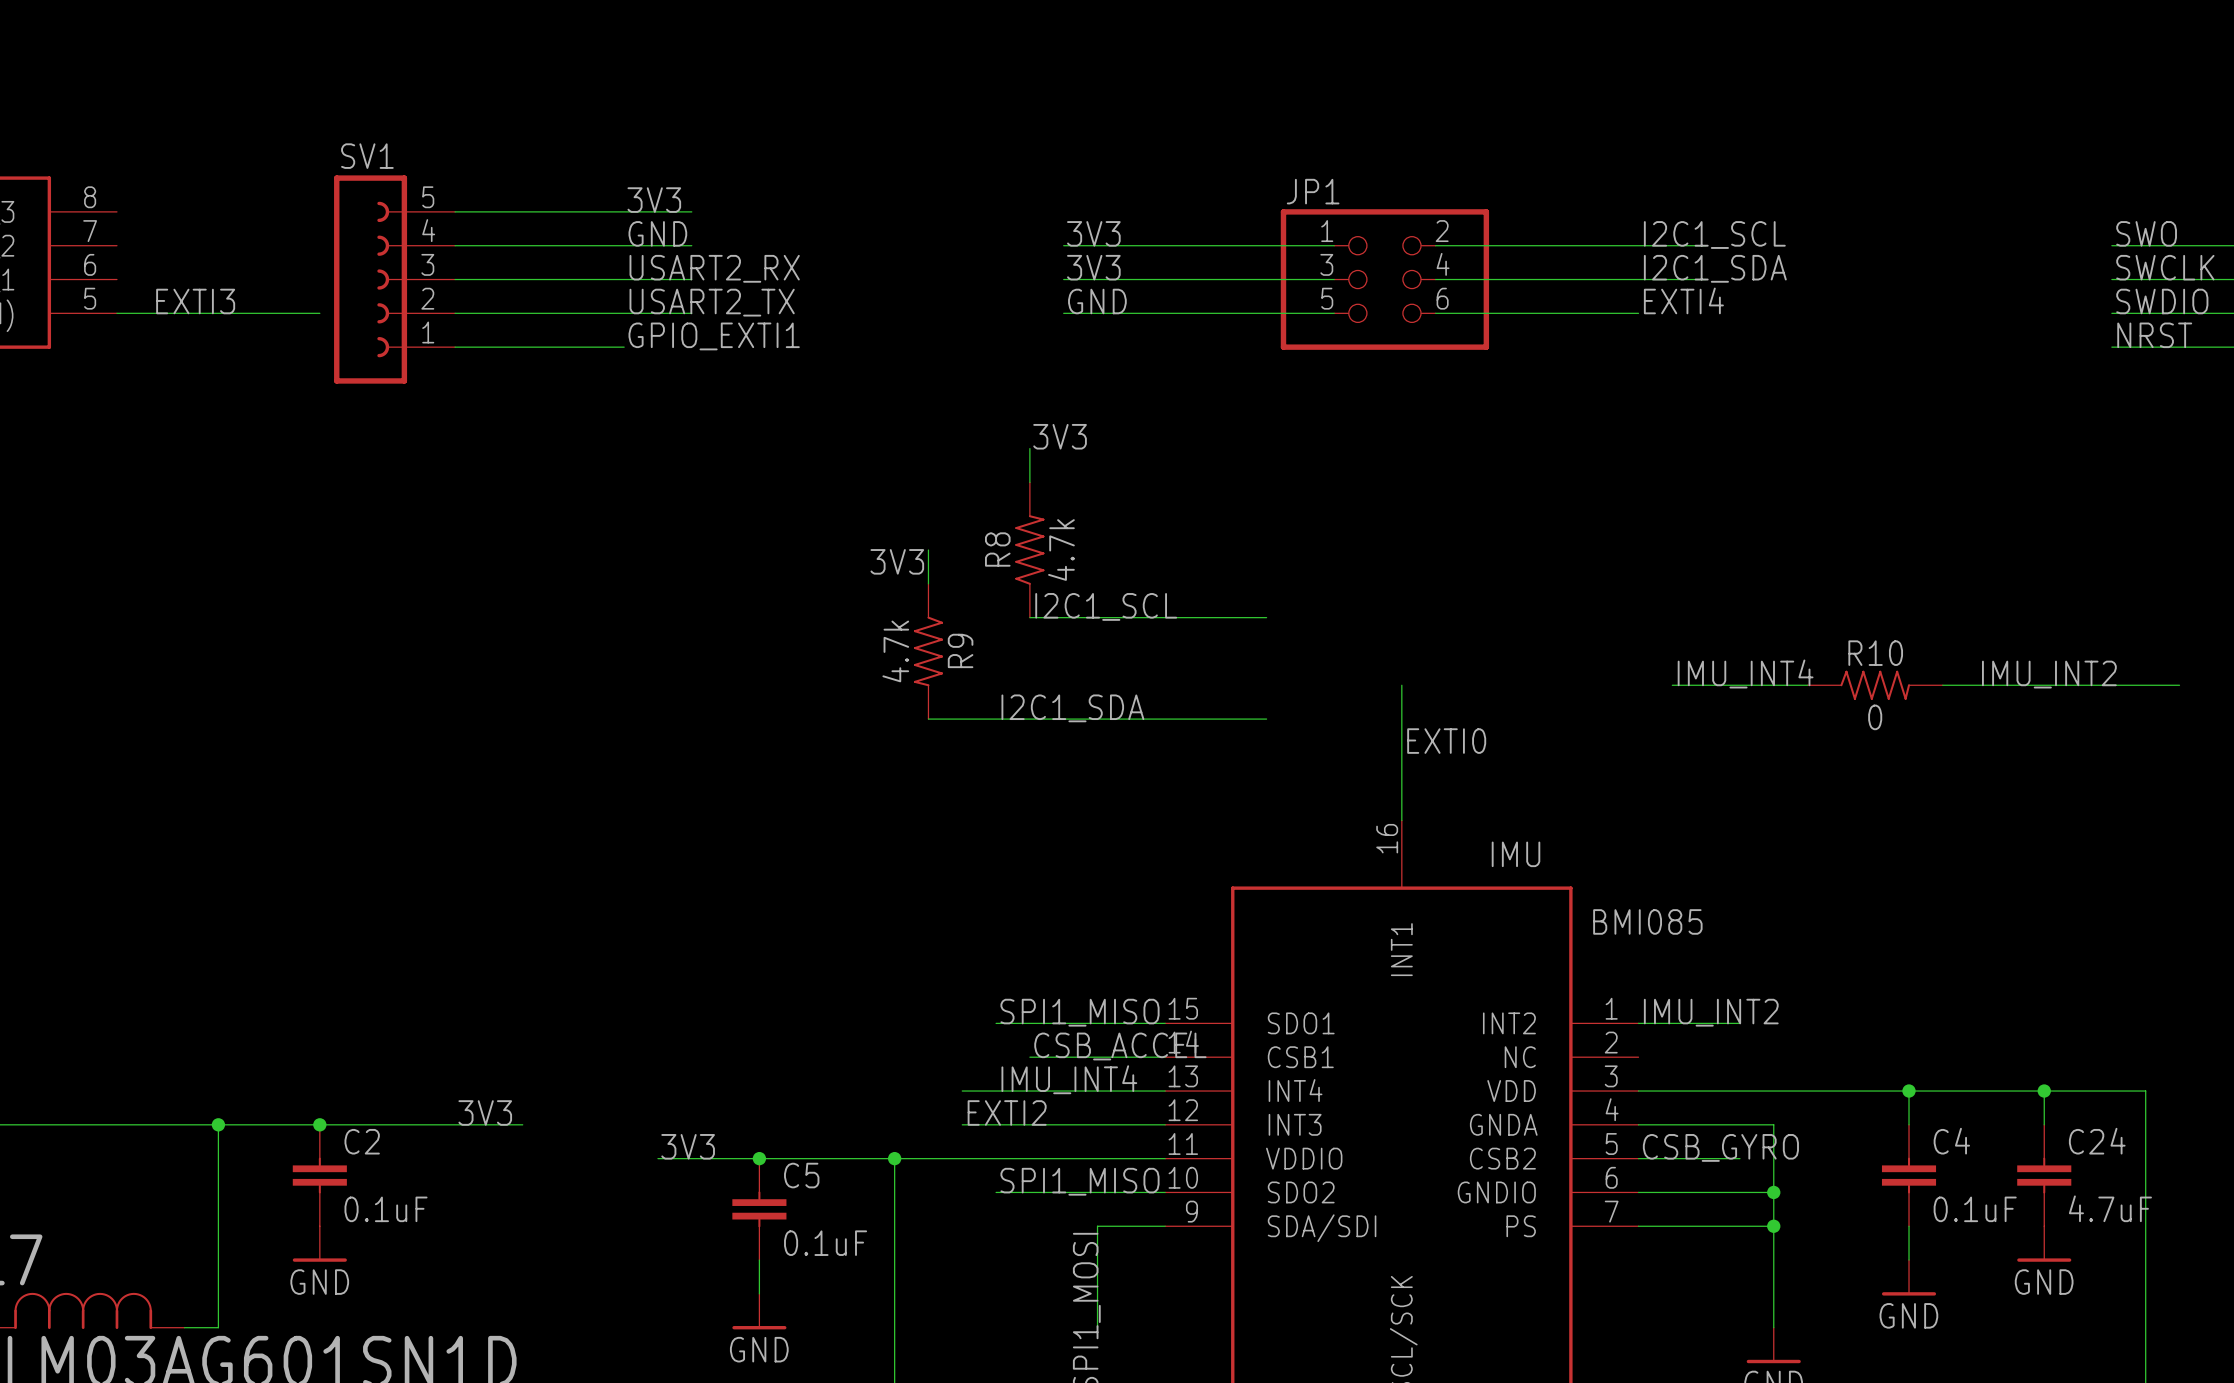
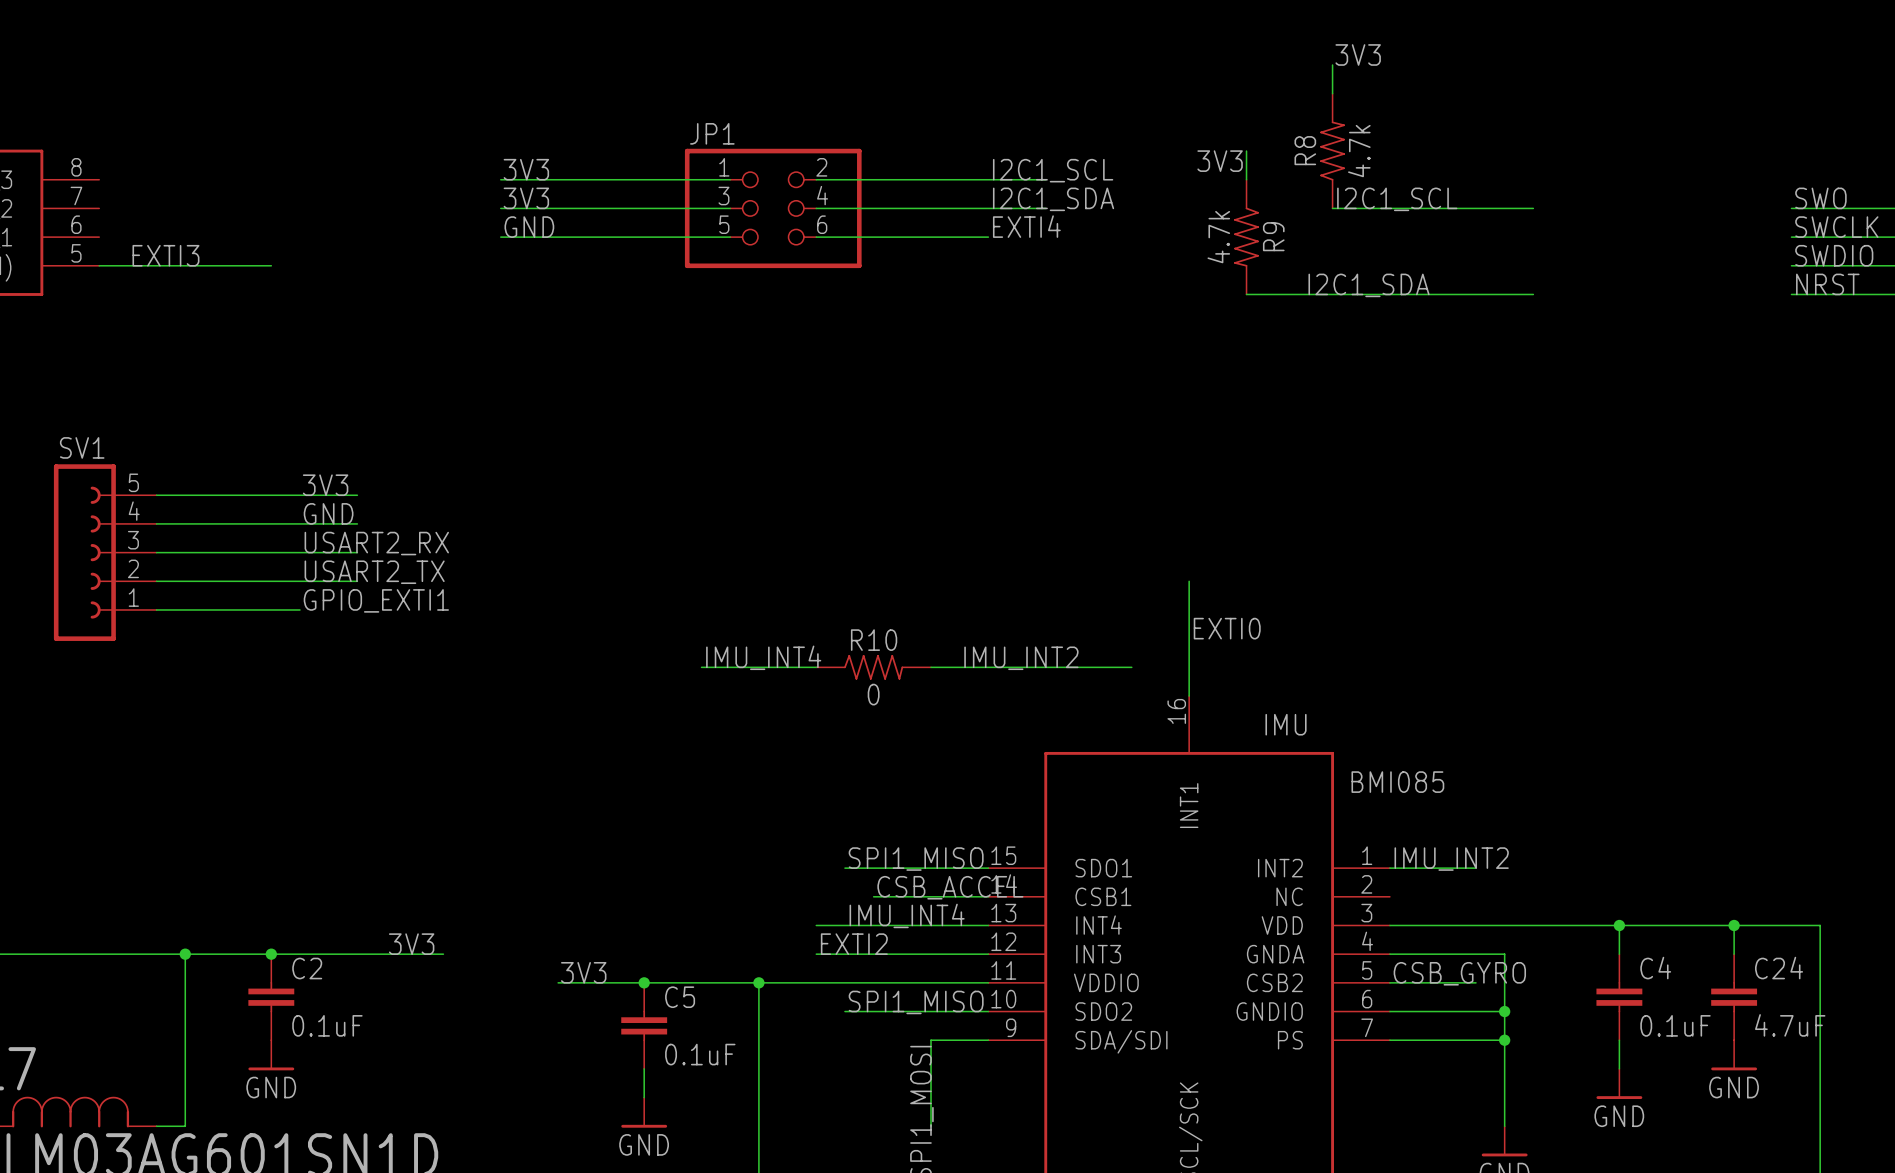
label: none -> 3V3 (1358, 54)
wire: none -> (1332, 65) (1332, 93)
wire: none -> (1246, 151) (1246, 179)
label: none -> 3V3 (1220, 161)
label: none -> 3V3 (526, 169)
label: 3V3 (654, 200) -> none
label: none -> I2C1_SCL (1053, 170)
wire: (455, 211) (590, 211) -> none
wire: none -> (586, 179) (730, 179)
label: none -> 3V3 (526, 198)
label position: GND (657, 233) -> GND (529, 227)
label: 3V3 (1093, 233) -> none
label: none -> I2C1_SDA (1053, 199)
label position: I2C1_SCL (1714, 235) -> I2C1_SCL (1397, 199)
wire: (455, 245) (590, 245) -> none
wire: none -> (586, 208) (730, 208)
wire: (1232, 245) (1334, 245) -> (816, 208) (902, 208)
wire: (1435, 245) (1570, 245) -> none
wire: none -> (1447, 208) (1533, 208)
label: 3V3 (1093, 267) -> none
label: none -> EXTI4 (1026, 226)
label: USART2_RX (714, 268) -> none
label position: I2C1_SDA (1715, 268) -> I2C1_SDA (1369, 285)
SV1 position: (394, 279) -> (105, 552)
wire: (455, 279) (590, 279) -> none
wire: none -> (816, 237) (902, 237)
wire: (1165, 279) (1334, 279) -> none
JP1 position: (1384, 279) -> (773, 208)
wire: (1435, 279) (1706, 279) -> none
label: EXTI4 (1683, 300) -> none
label: GND (1097, 301) -> none
label: USART2_TX (712, 302) -> none
wire: (455, 313) (691, 313) -> none
wire: (1063, 313) (1334, 313) -> (816, 179) (1045, 179)
wire: (1435, 313) (1638, 313) -> none
label: GPIO_EXTI1 (714, 336) -> none
wire: (455, 347) (624, 347) -> (586, 237) (730, 237)
wire: none -> (1246, 294) (1533, 294)
label: 3V3 (1060, 436) -> none
wire: (1029, 448) (1029, 482) -> none
wire: (928, 550) (928, 583) -> none
R8 position: (1029, 550) -> (1332, 151)
label: 3V3 (897, 561) -> none
label: none -> 3V3 (325, 485)
wire: none -> (156, 495) (357, 495)
label: none -> GND (328, 513)
label: I2C1_SCL (1106, 606) -> none
wire: none -> (156, 523) (357, 523)
wire: (1029, 617) (1266, 617) -> (931, 667) (1131, 667)
label: none -> USART2_RX (376, 543)
wire: none -> (156, 552) (357, 552)
R9 position: (928, 651) -> (1246, 237)
label: IMU_INT4 (1745, 673) -> none
label: none -> USART2_TX (374, 572)
label: IMU_INT2 (2049, 674) -> none
wire: none -> (156, 581) (357, 581)
wire: (1672, 685) (1807, 685) -> none
R10 position: (1875, 685) -> (873, 667)
wire: (1942, 685) (2179, 685) -> none
label: none -> GPIO_EXTI1 (376, 600)
label: I2C1_SDA (1072, 708) -> none
wire: none -> (156, 609) (300, 609)
wire: (928, 719) (1266, 719) -> none
label: none -> IMU_INT4 (763, 657)
label: none -> IMU_INT2 (1021, 658)
wire: none -> (701, 667) (816, 667)

